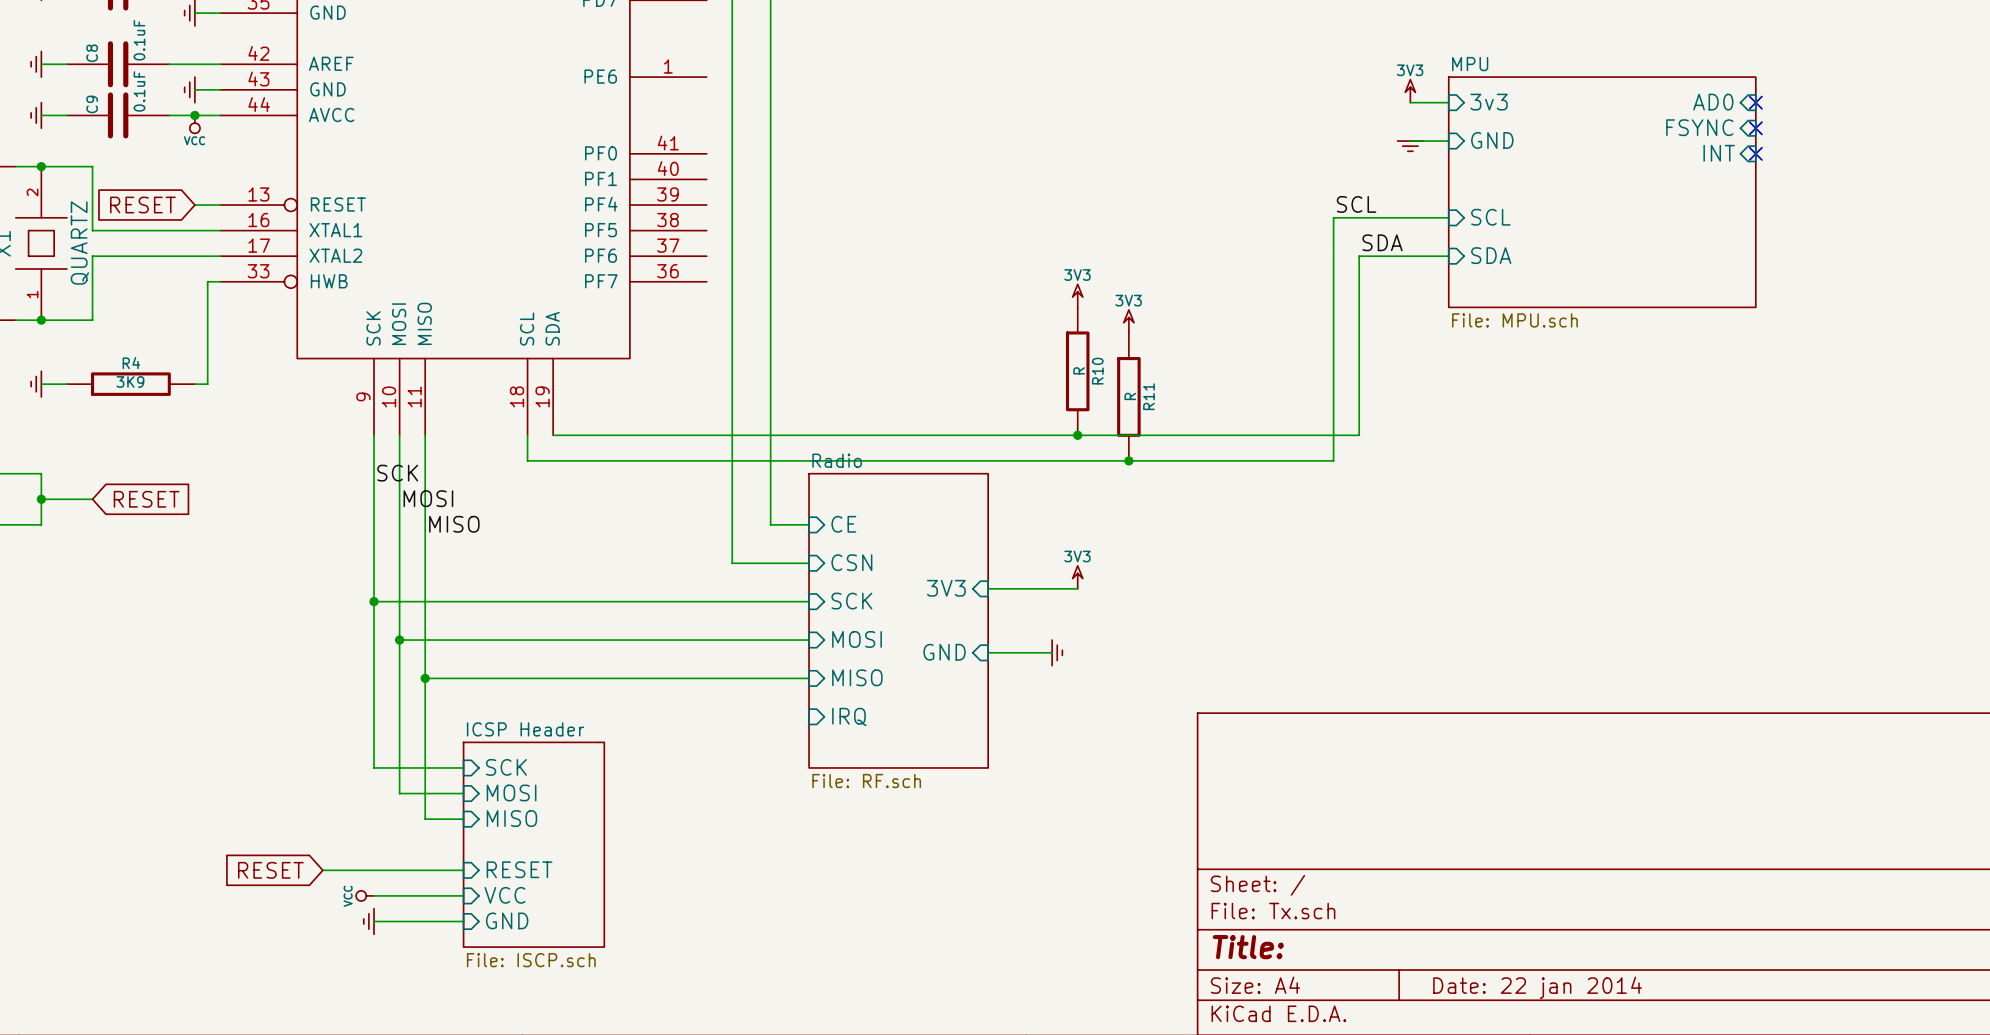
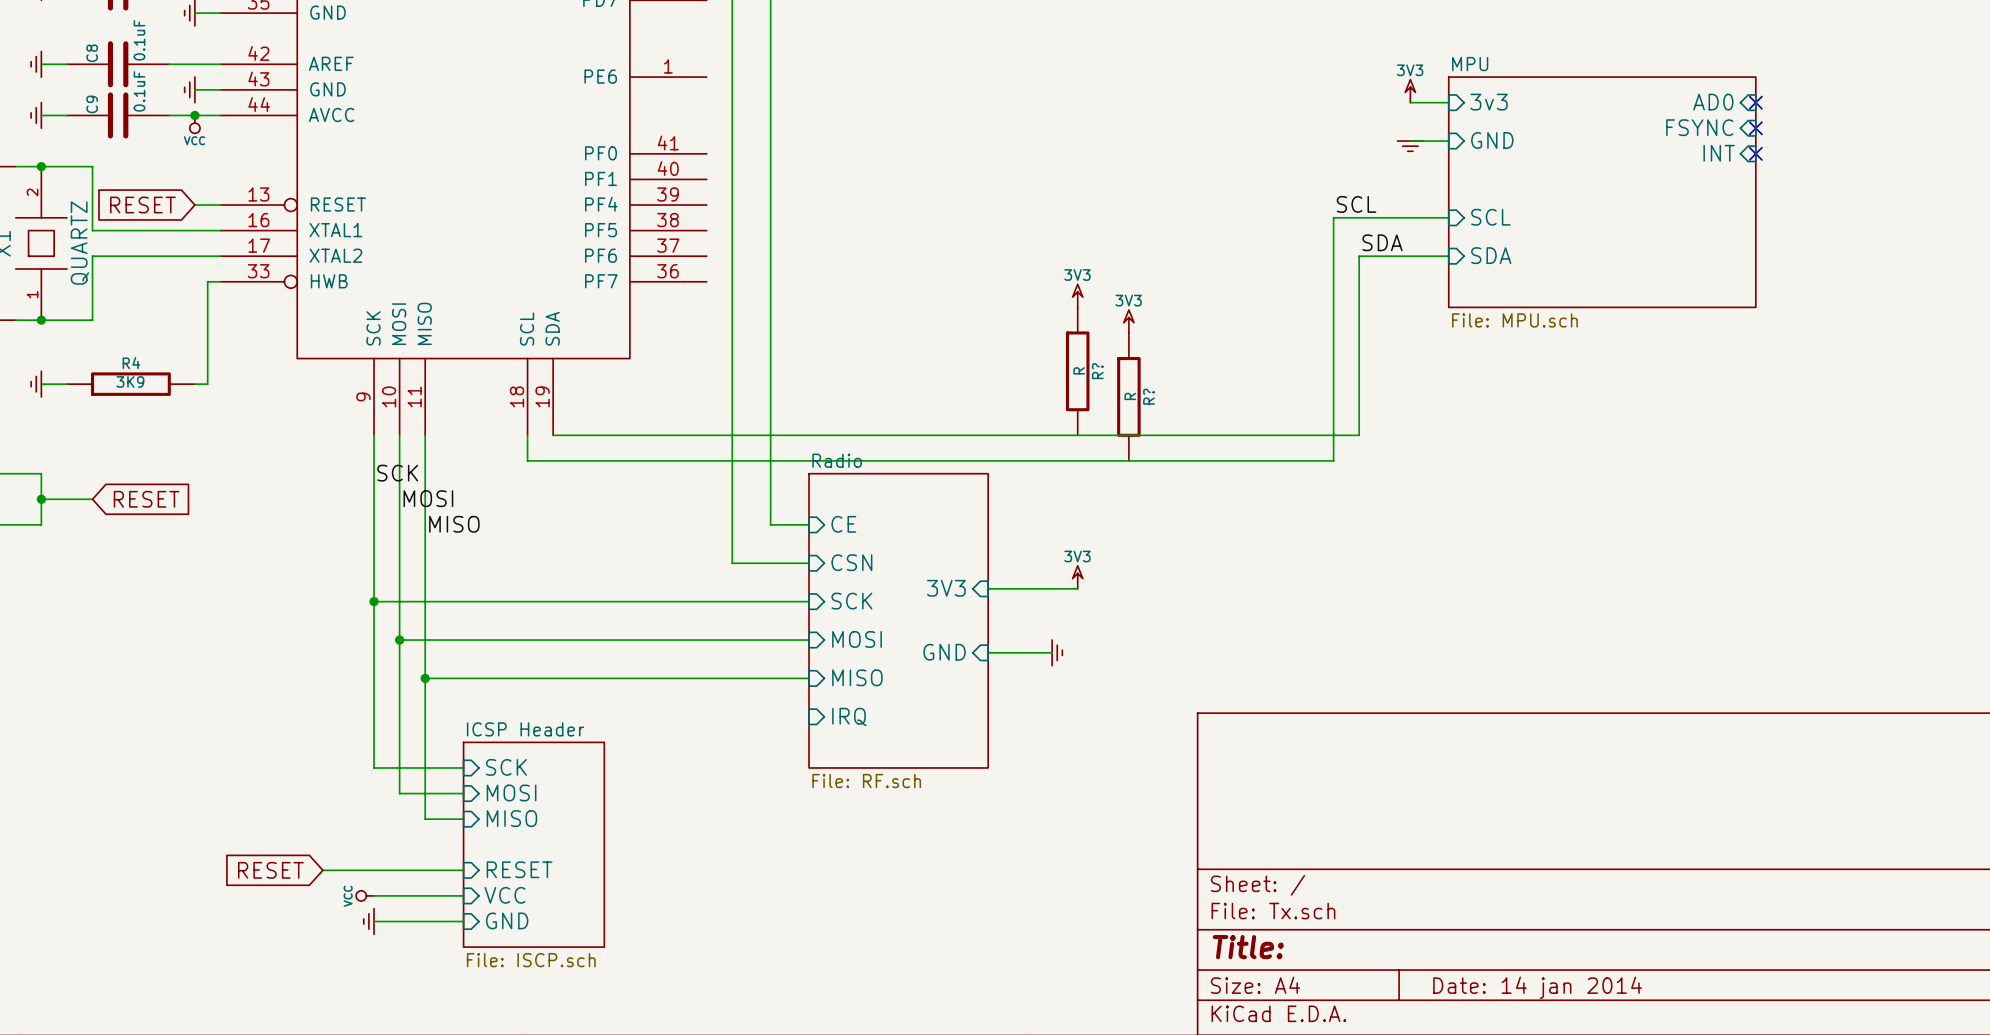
R10 name: R10 (1097, 371) -> R? (1097, 371)
R11 name: R11 (1148, 396) -> R? (1148, 396)
junction: (1077, 435) -> none
junction: (1128, 460) -> none
title block: Date: 22 jan 2014 (1537, 987) -> Date: 14 jan 2014 (1537, 987)

